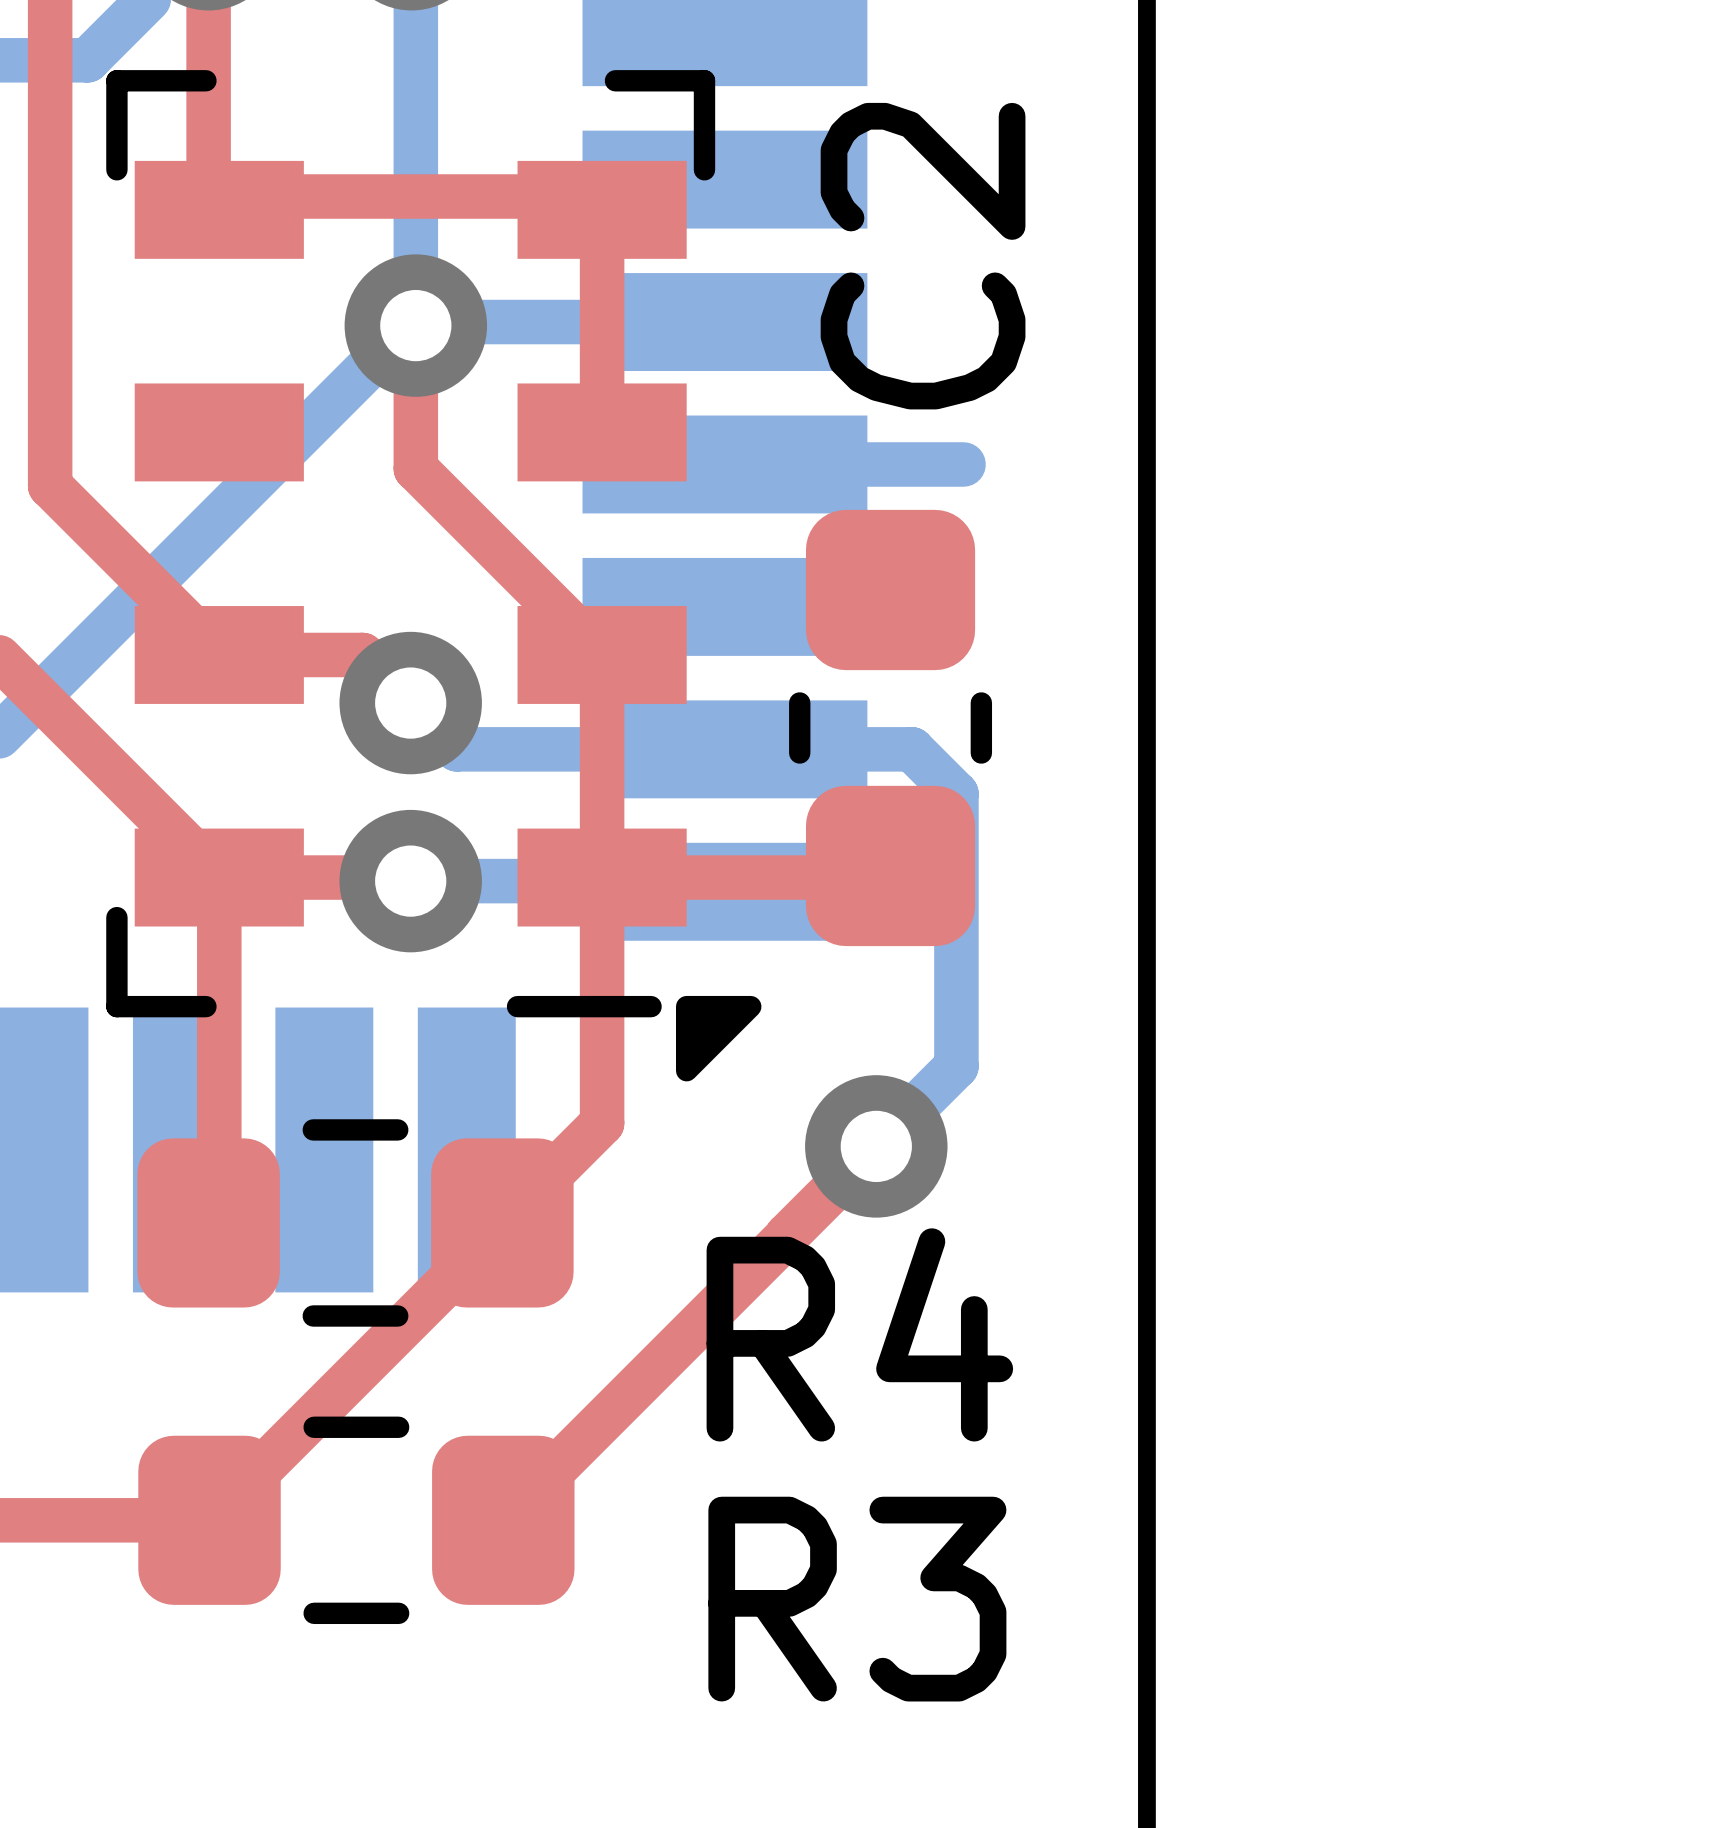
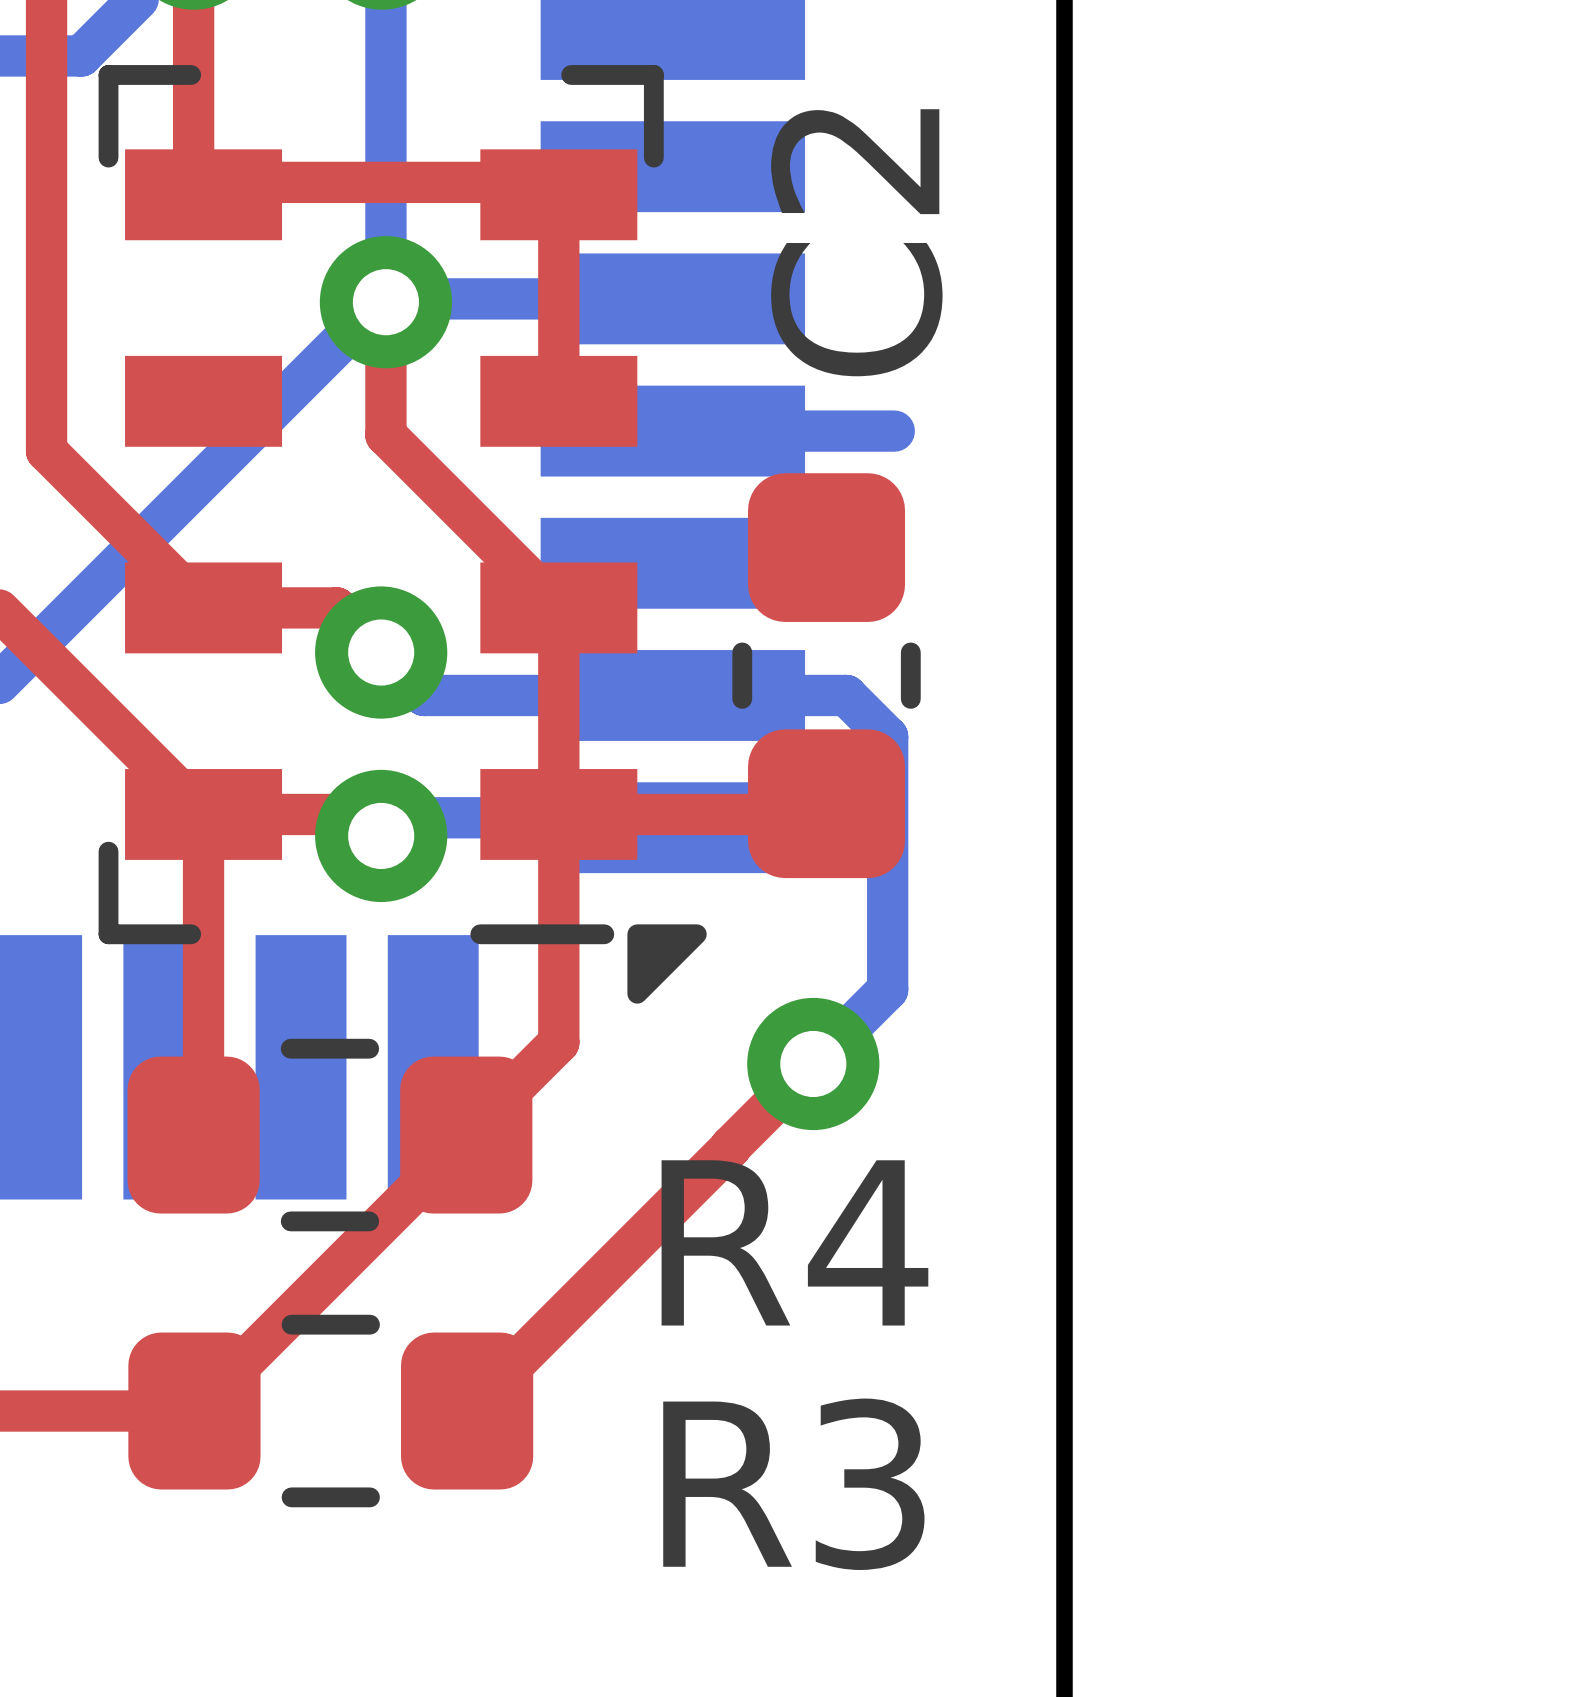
via position: (410, 881) -> (381, 835)

